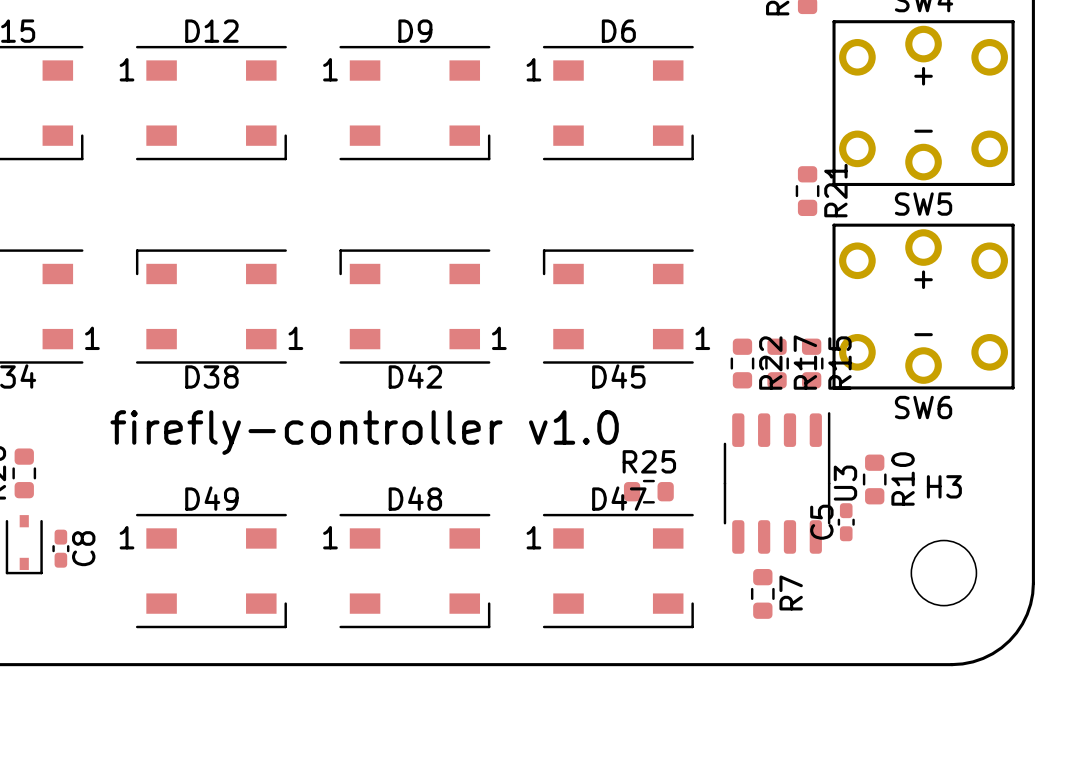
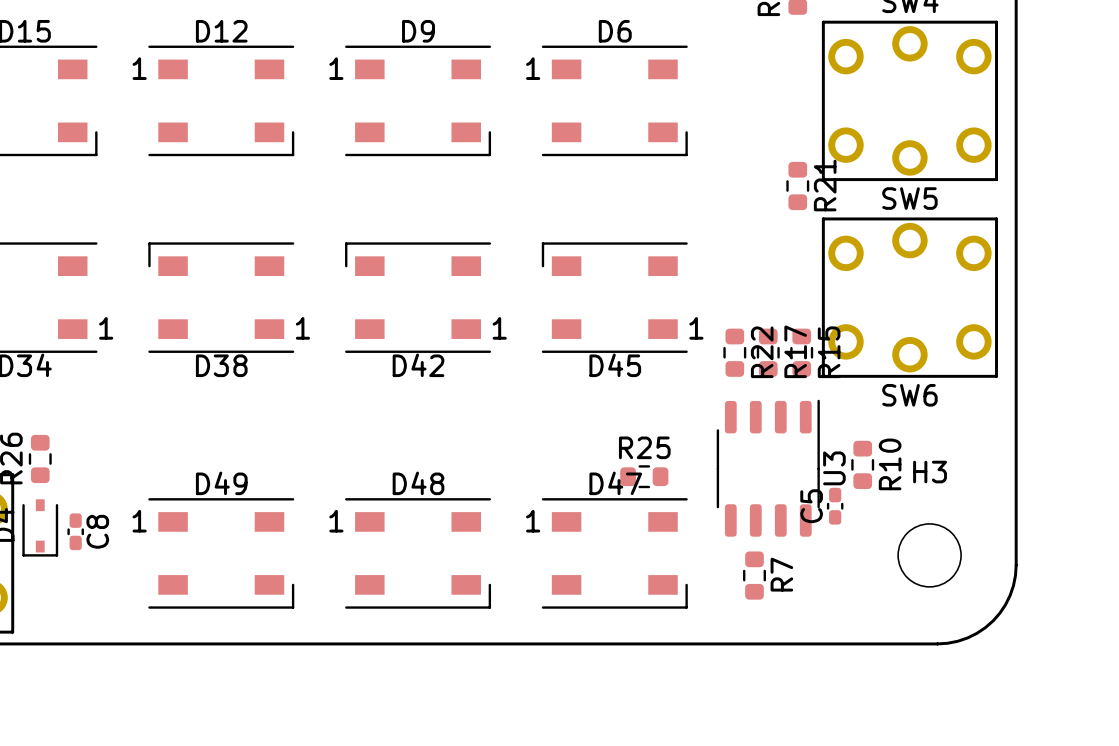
SW5 text: + (923, 76) -> none
SW5 text: - (923, 131) -> none
SW6 text: + (923, 279) -> none
SW6 text: - (923, 334) -> none
text: firefly-controller v1.0 (364, 432) -> none

